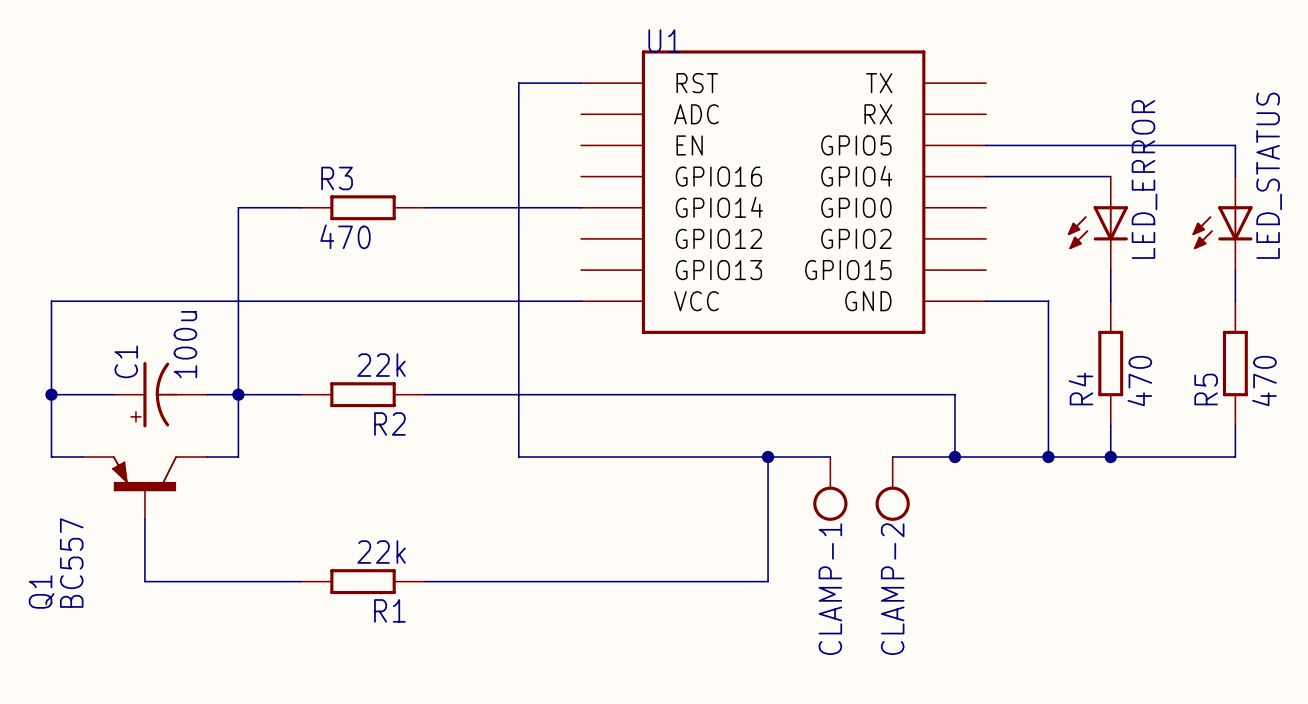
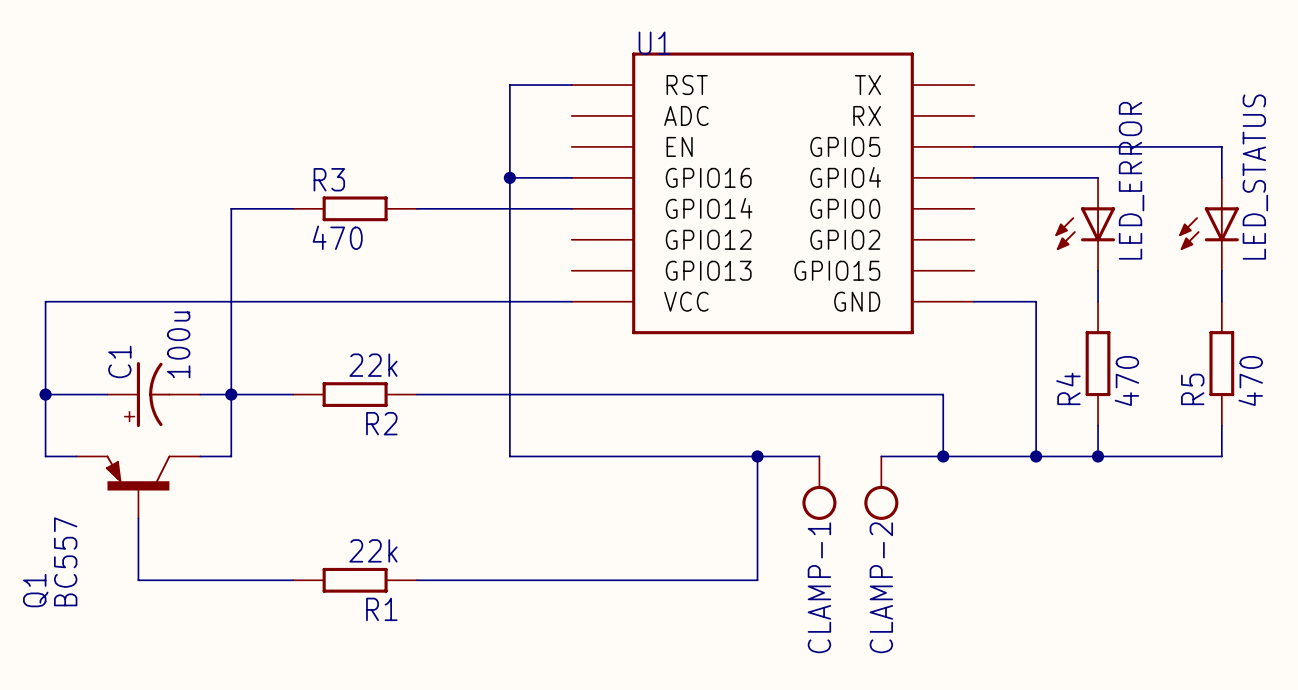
wire: none -> (509, 177) (571, 177)
junction: none -> (509, 177)

